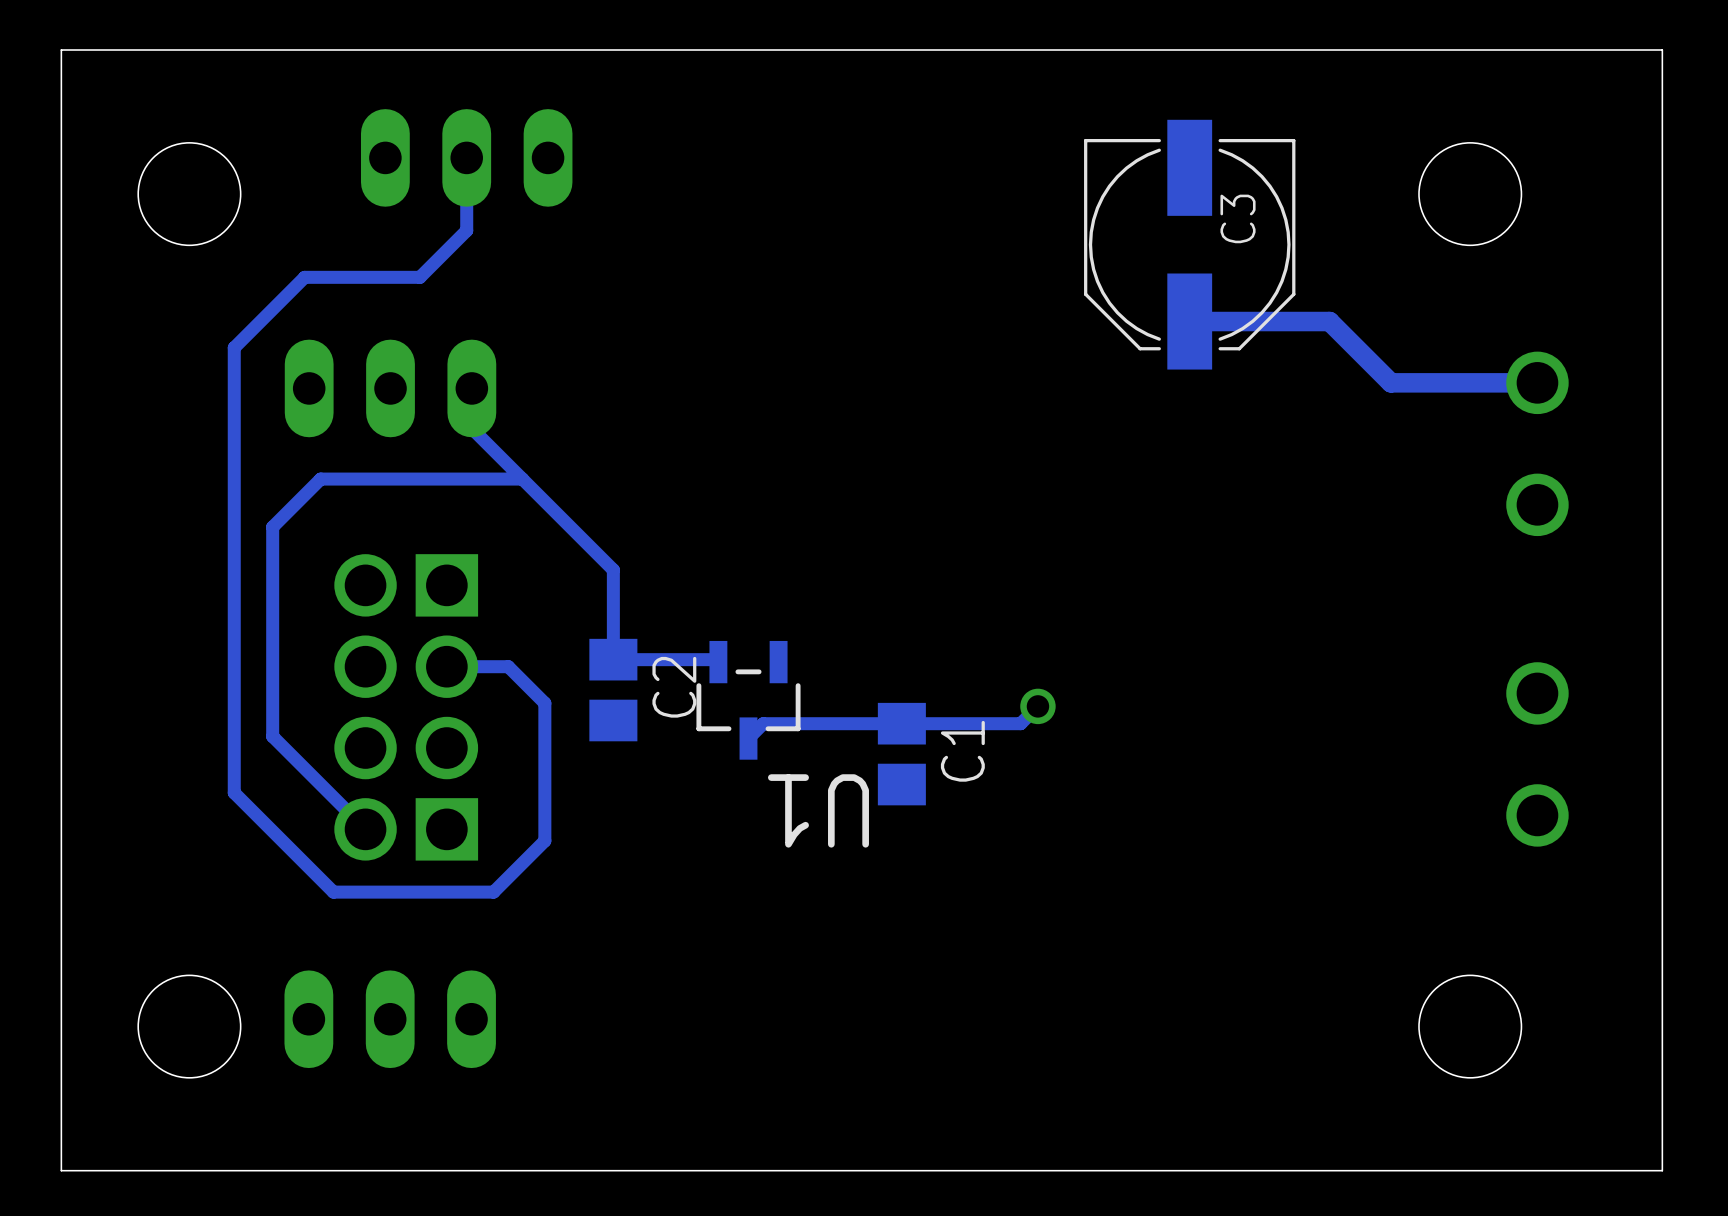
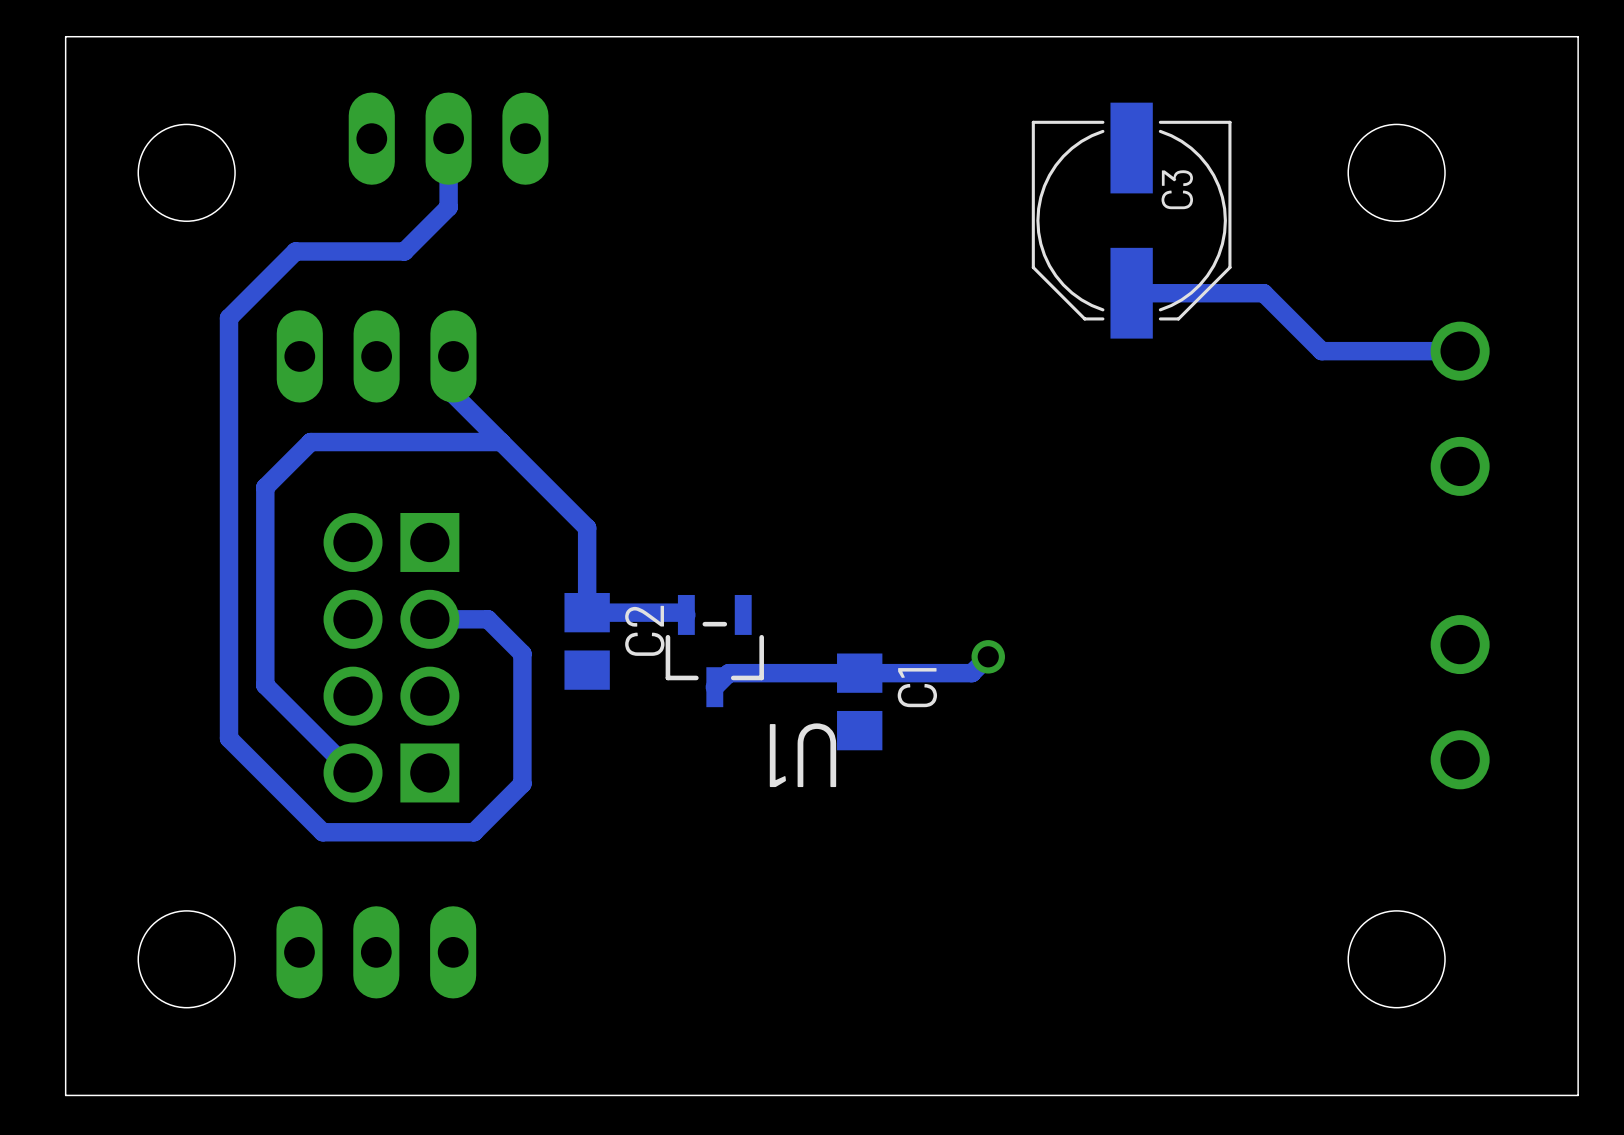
track width: thin (466, 157) (466, 230) (419, 277) (304, 277) (234, 347) (234, 792) (333, 892) (493, 892) (544, 840) (544, 703) (508, 666) (446, 666) -> thick (448, 138) (448, 207) (404, 251) (295, 251) (229, 318) (229, 738) (322, 832) (474, 832) (522, 783) (522, 653) (487, 619) (429, 619)
track width: thin (471, 388) (471, 428) (613, 570) (613, 659) (715, 659) (718, 662) -> thick (453, 356) (453, 394) (587, 527) (587, 612) (684, 612) (686, 614)
track width: thin (522, 479) (320, 479) (272, 527) (272, 736) (365, 829) -> thick (501, 442) (310, 442) (265, 487) (265, 685) (353, 772)
track width: thin (1037, 706) (1020, 723) (763, 723) (748, 738) -> thick (988, 656) (971, 673) (728, 673) (714, 687)

